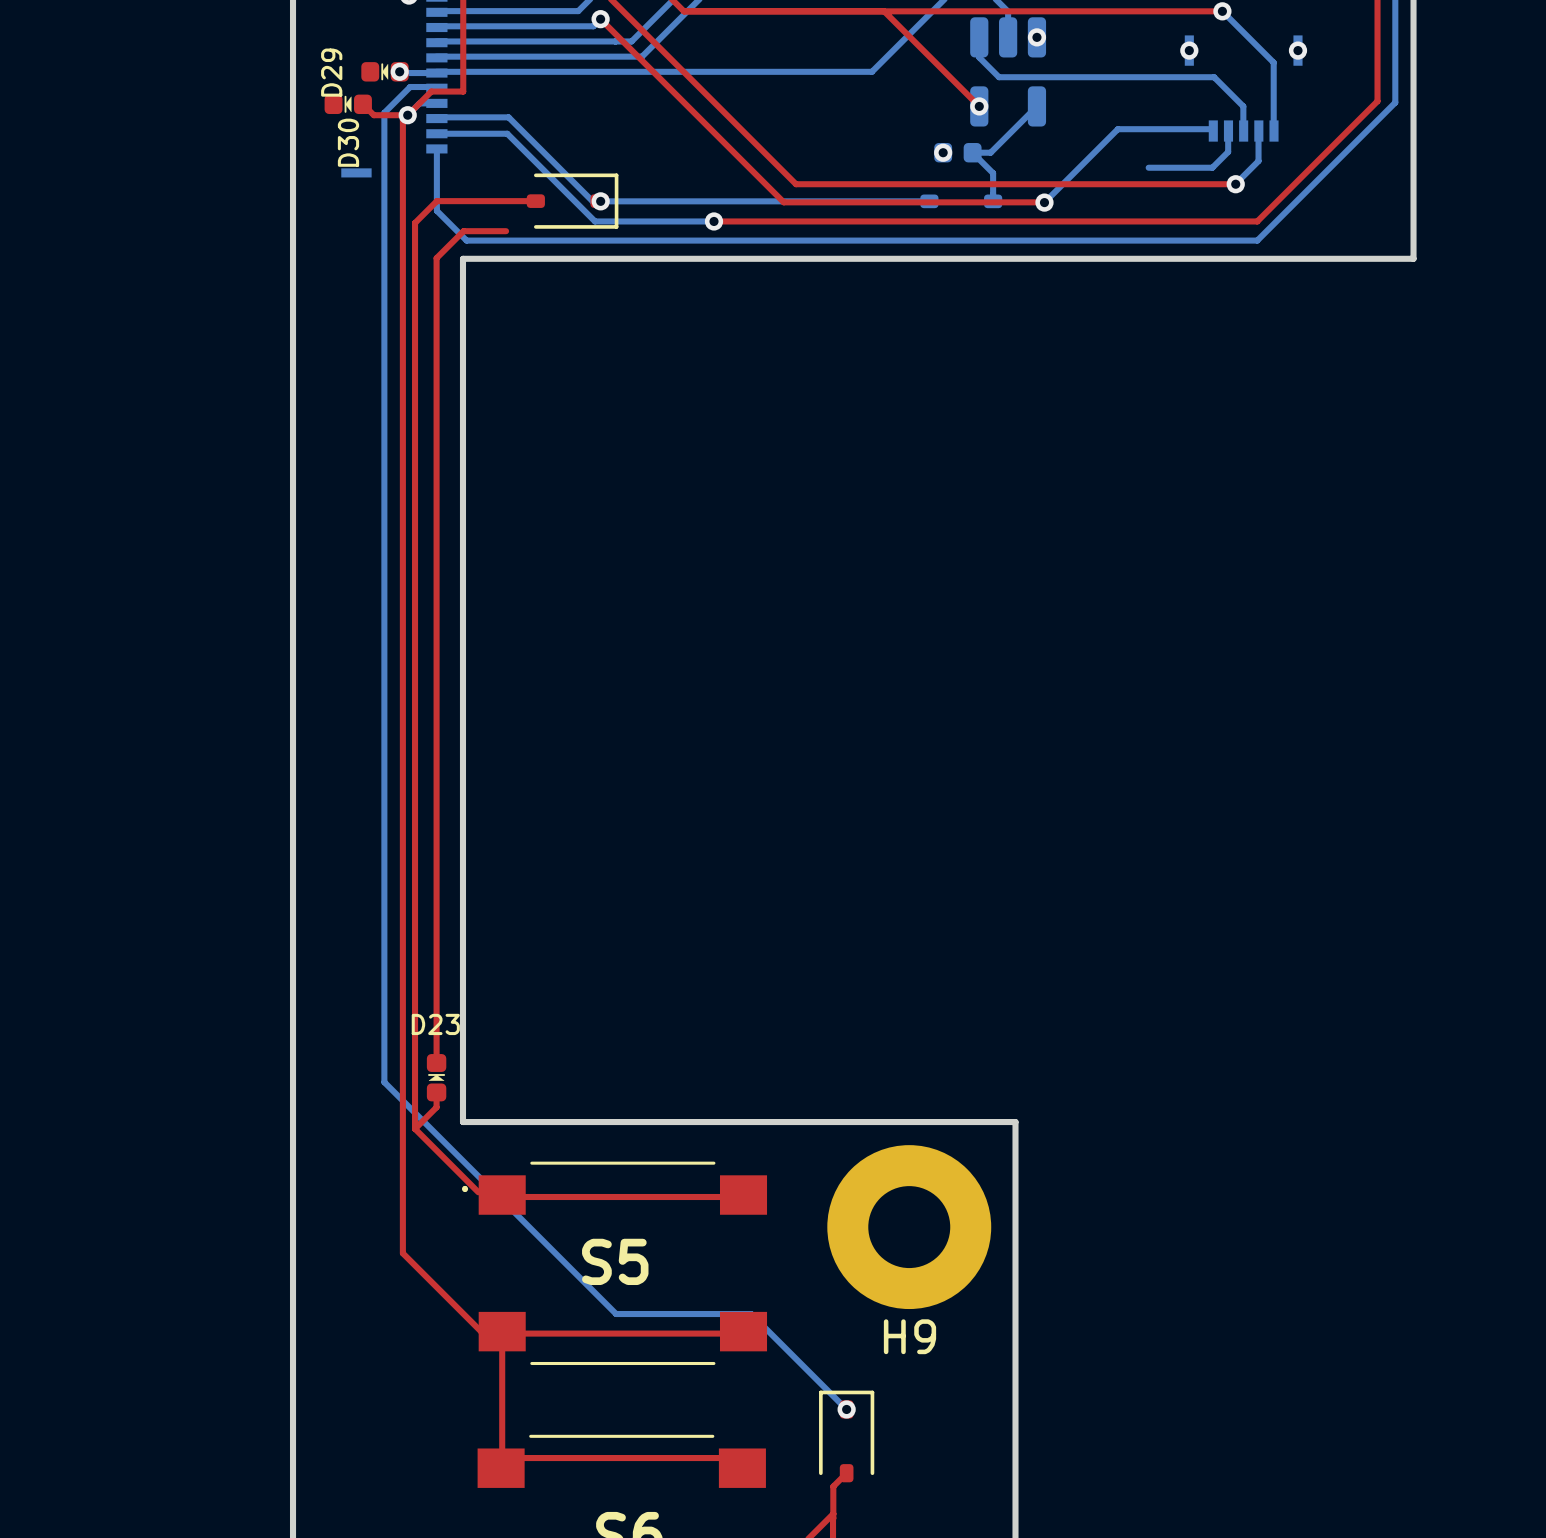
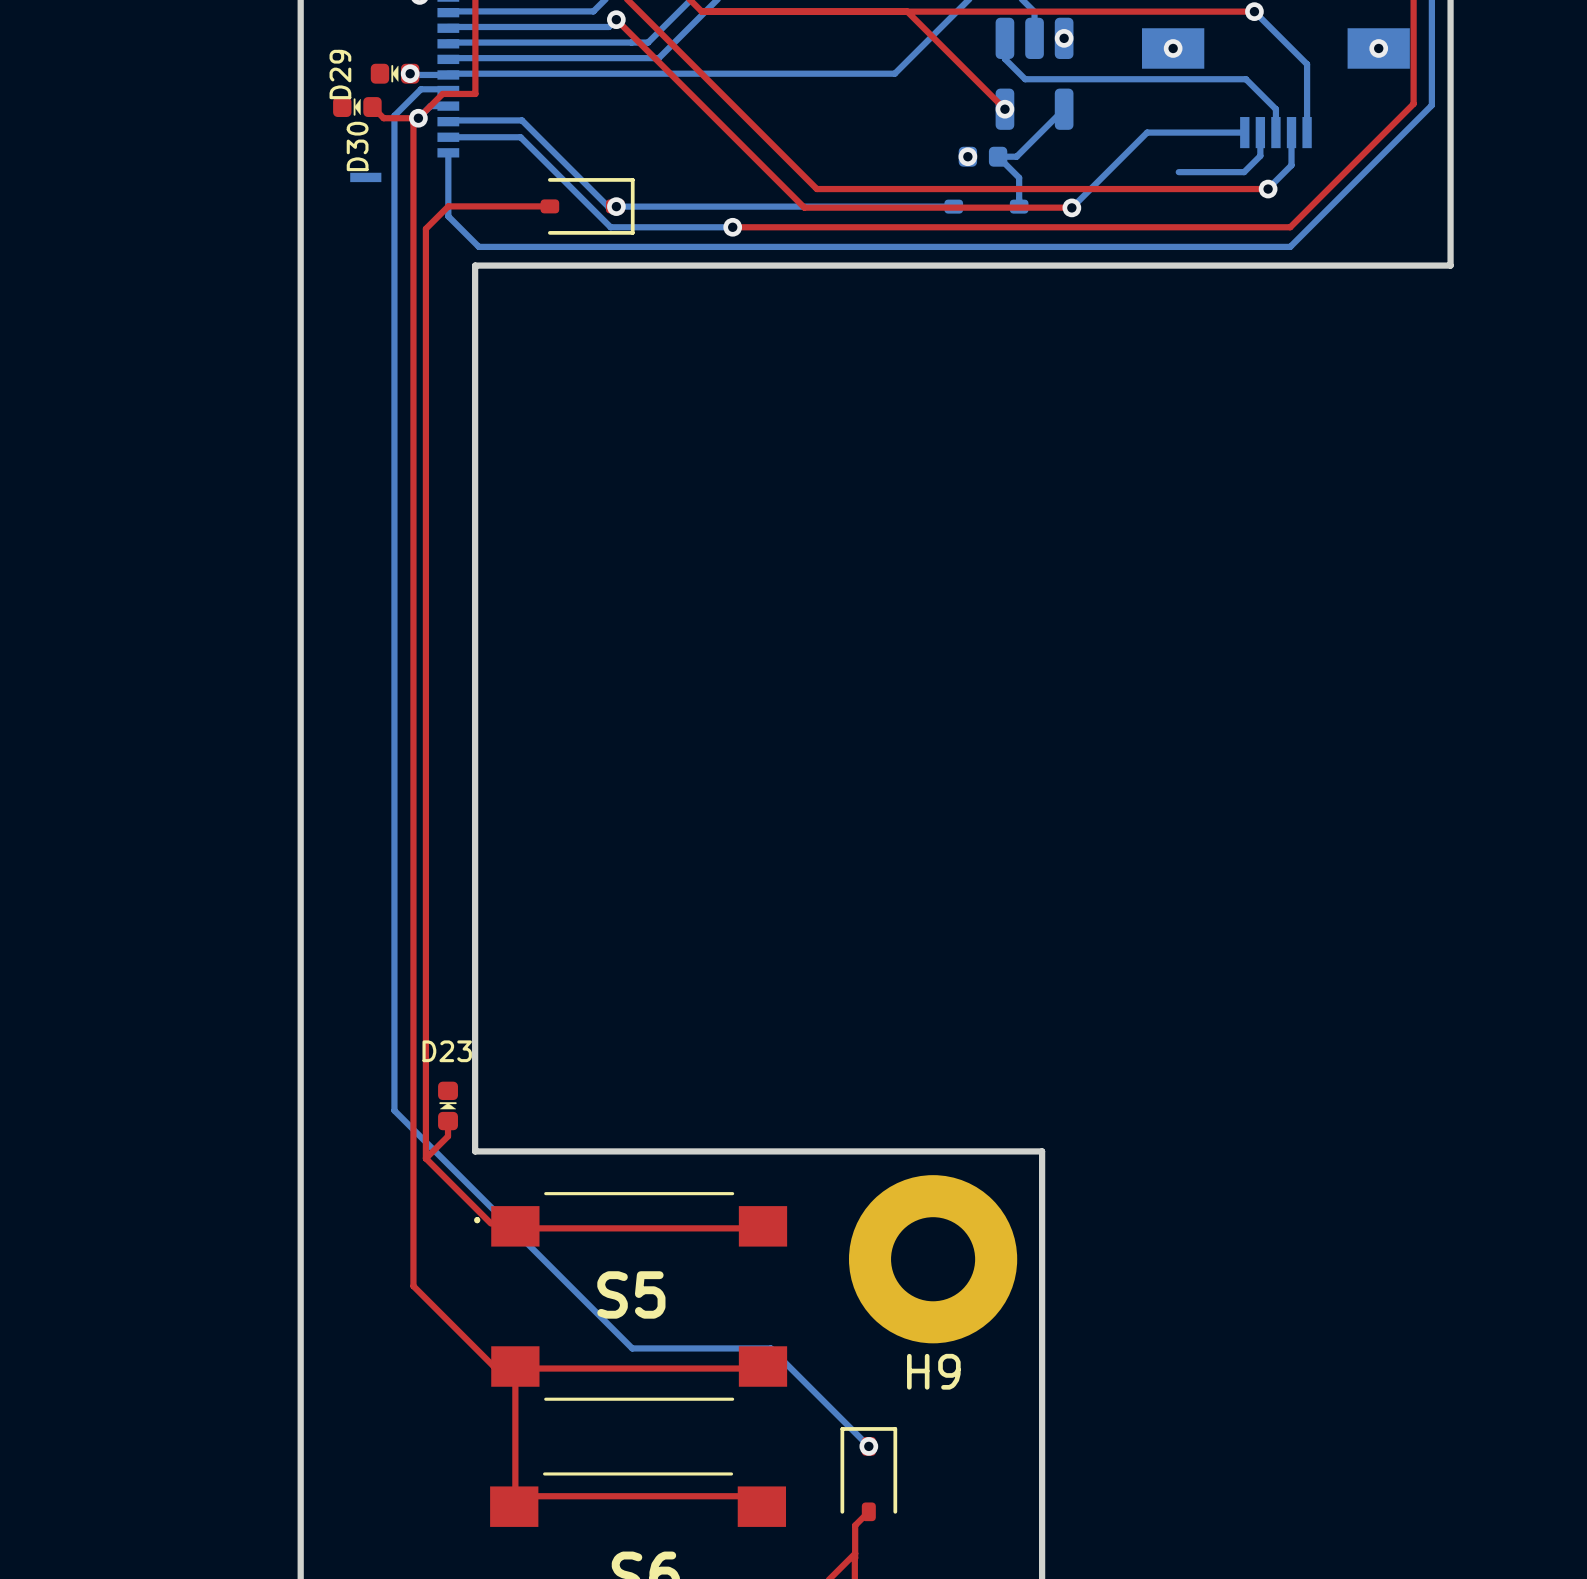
part footprint: [1184, 35, 1303, 142] -> [1142, 28, 1410, 149]
via position: (1189, 50) -> (1173, 48)
via position: (1297, 50) -> (1378, 48)
top track: (506, 231) (463, 231) (436, 258) (436, 1062) -> none

